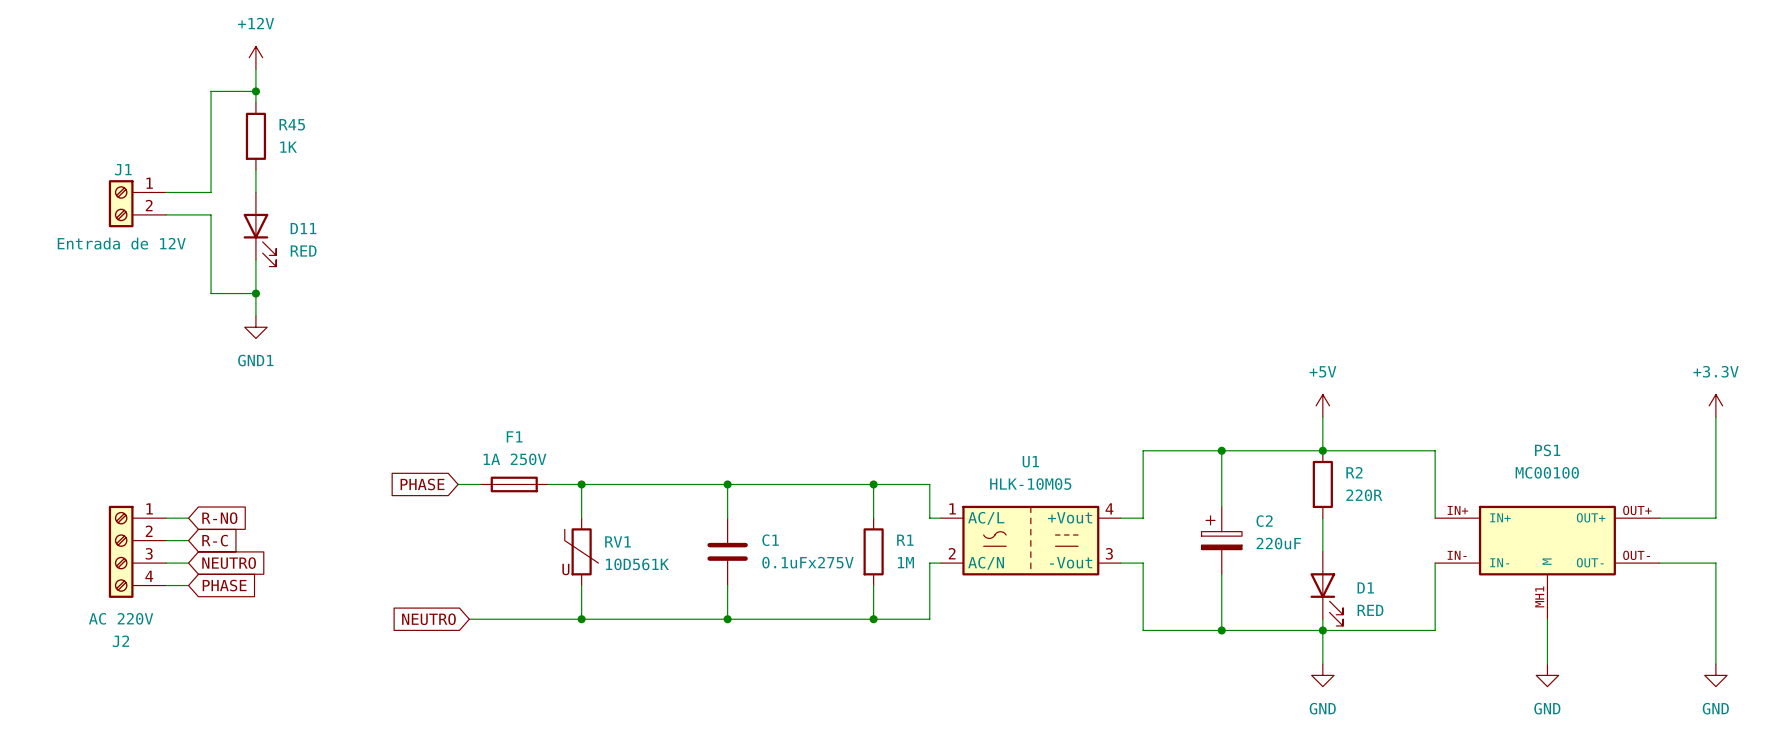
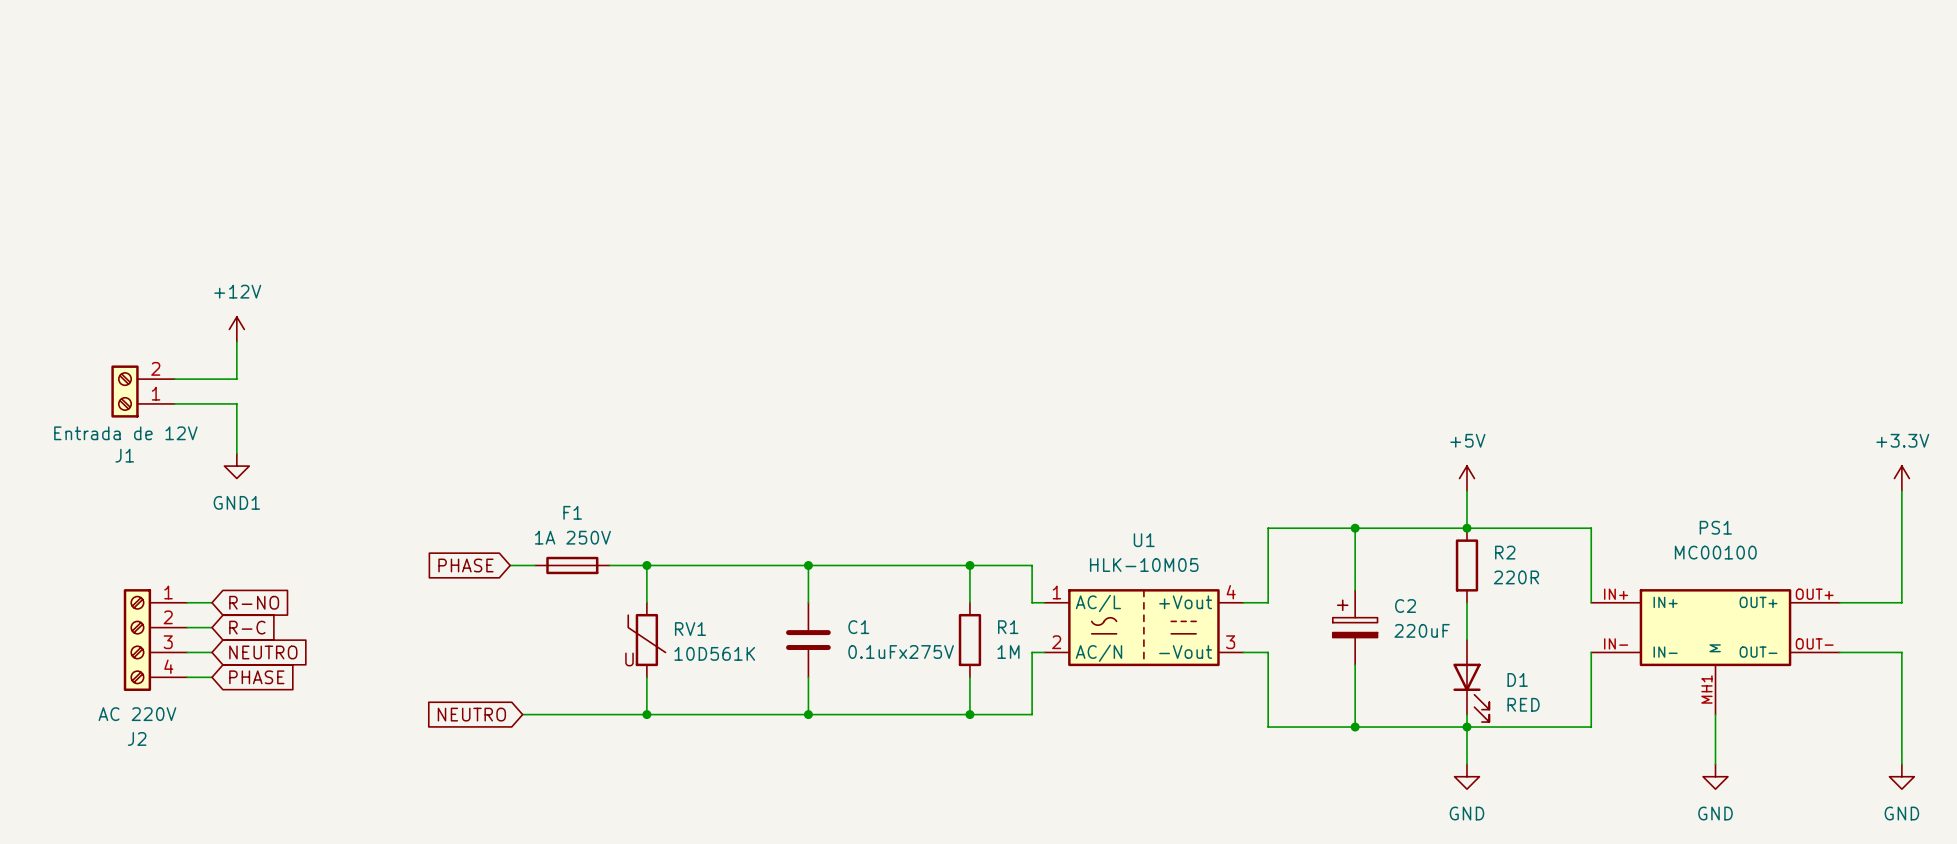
power symbol position: +12V (255, 57) -> +12V (236, 329)
wire: (255, 68) (255, 102) -> none
wire: (255, 91) (211, 91) (211, 192) (166, 192) -> none
junction: (255, 91) -> none
R45: 1K (255, 136) -> none
J1 name position: J1 (123, 169) -> J1 (124, 455)
wire: (255, 170) (255, 192) -> none
J1 flip: as is (121, 203) -> up-down (125, 391)
J1 position: (137, 203) -> (143, 391)
wire: (166, 214) (211, 214) (211, 282) -> none
D11: RED (259, 229) -> none
wire: (255, 259) (255, 316) -> none
wire: (211, 293) (255, 293) -> (236, 354) (236, 379) (174, 379)
junction: (255, 293) -> none
power symbol position: GND1 (255, 327) -> GND1 (236, 466)
wire: none -> (174, 403) (236, 403) (236, 453)

